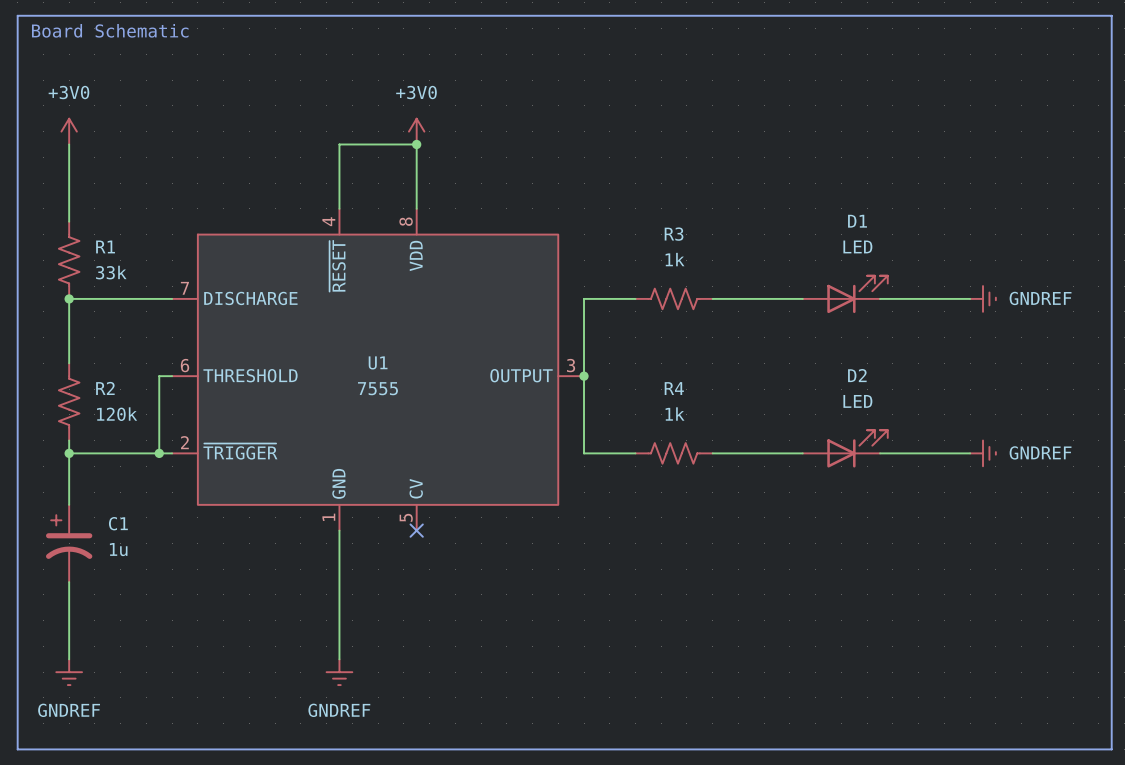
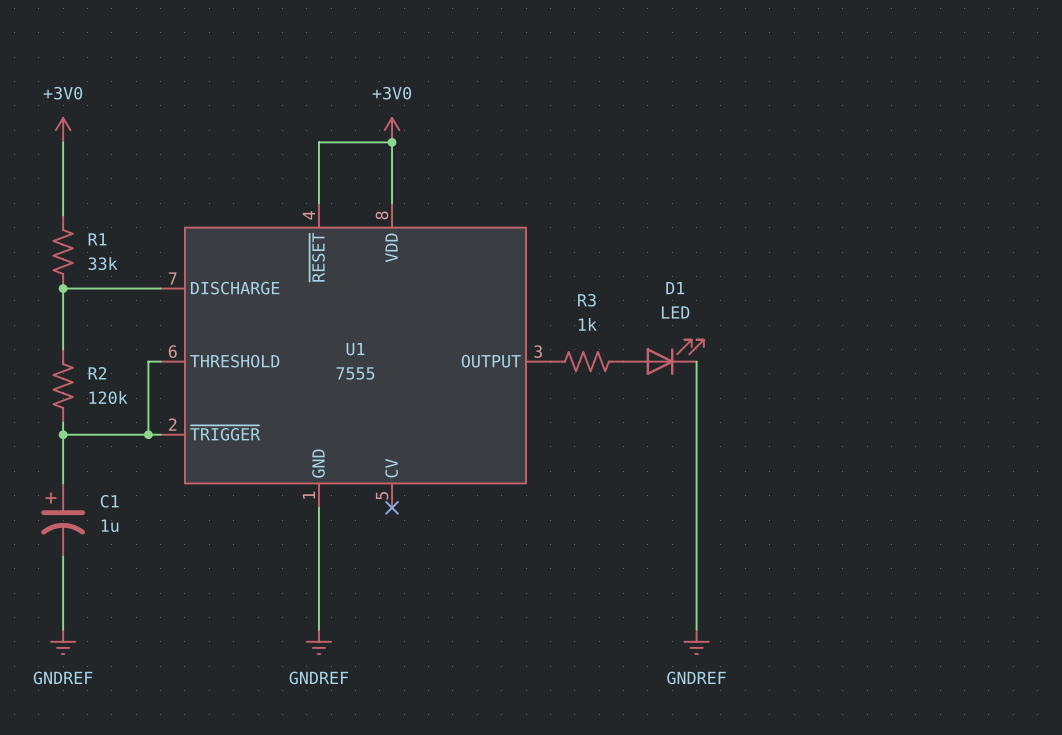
line: (17, 15) (1111, 15) (1111, 749) (17, 749) (17, 15) -> none
text: Board Schematic (110, 30) -> none
D1 position: (845, 294) -> (663, 357)
wire: (635, 298) (584, 298) (584, 453) (635, 453) -> none
R3 position: (674, 298) -> (586, 361)
wire: (712, 298) (802, 298) -> none
wire: (880, 298) (970, 298) -> none
power symbol: GNDREF (983, 298) -> none
junction: (584, 376) -> none
wire: none -> (696, 361) (696, 629)
D2: LED (845, 448) -> none
R4: 1k (674, 453) -> none
wire: (712, 453) (802, 453) -> none
wire: (880, 453) (970, 453) -> none
power symbol: GNDREF (983, 453) -> none
power symbol: none -> GNDREF (696, 641)

